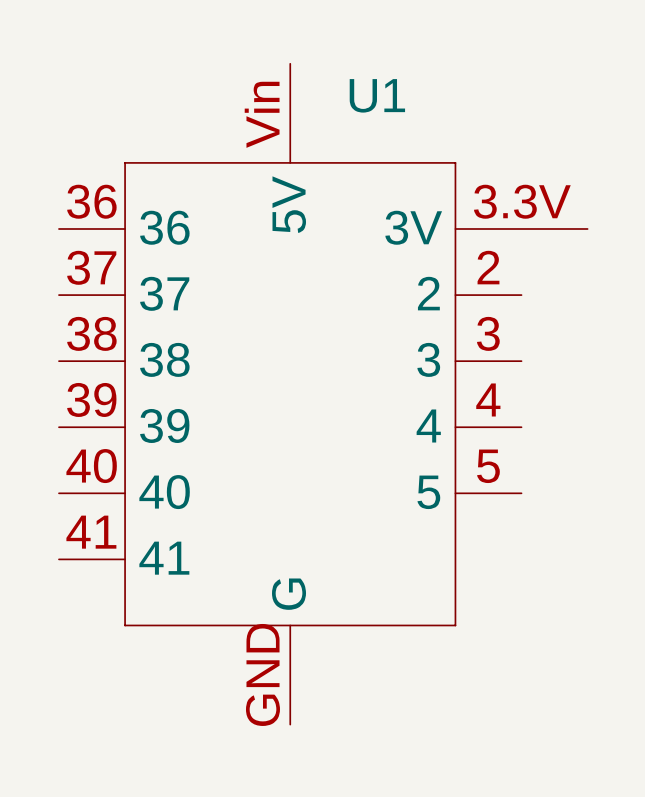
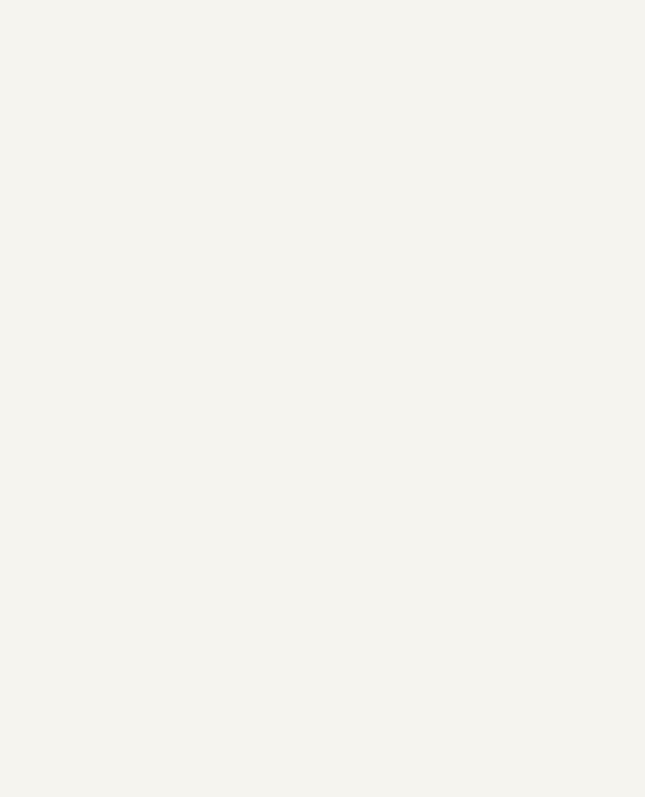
U1: (323, 394) -> none

